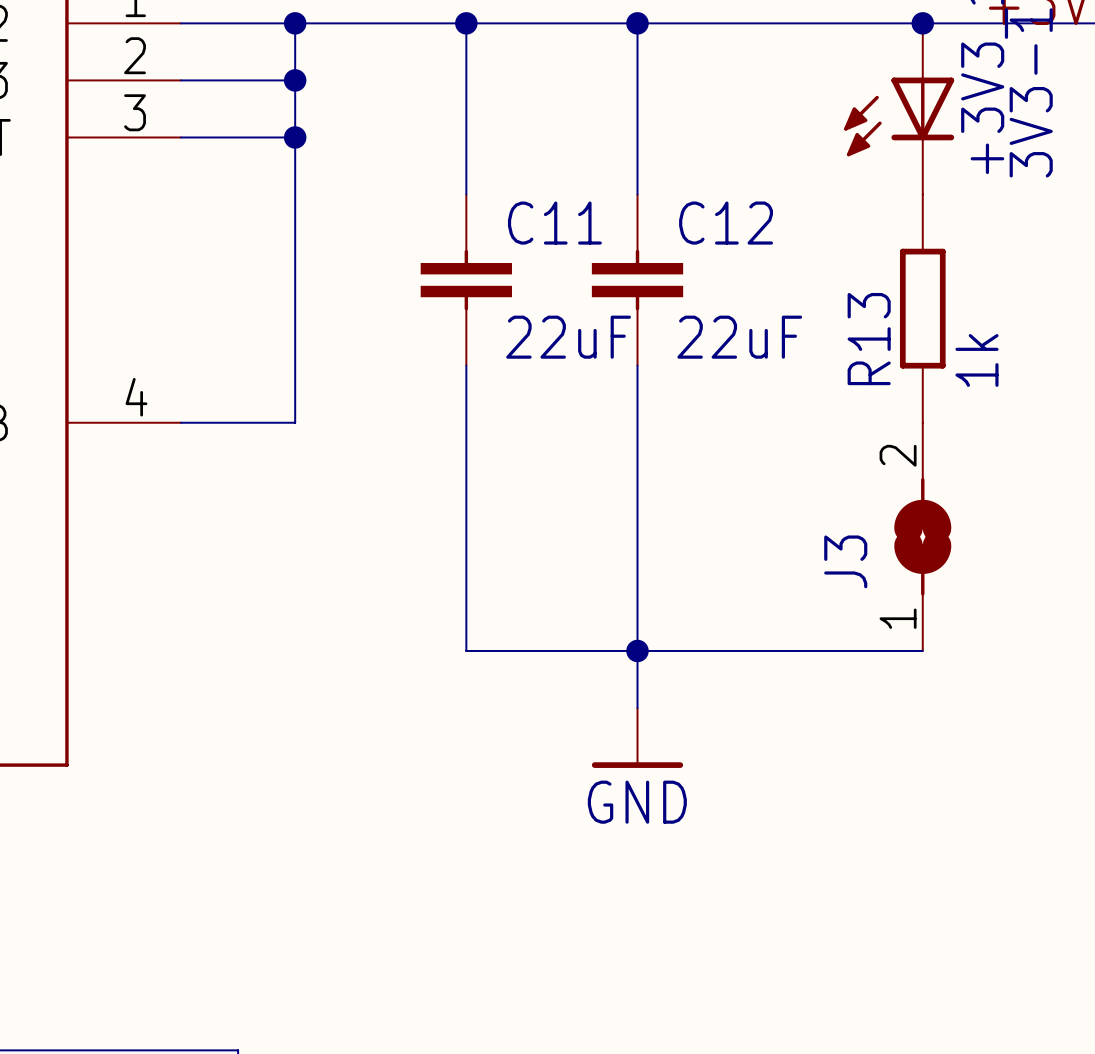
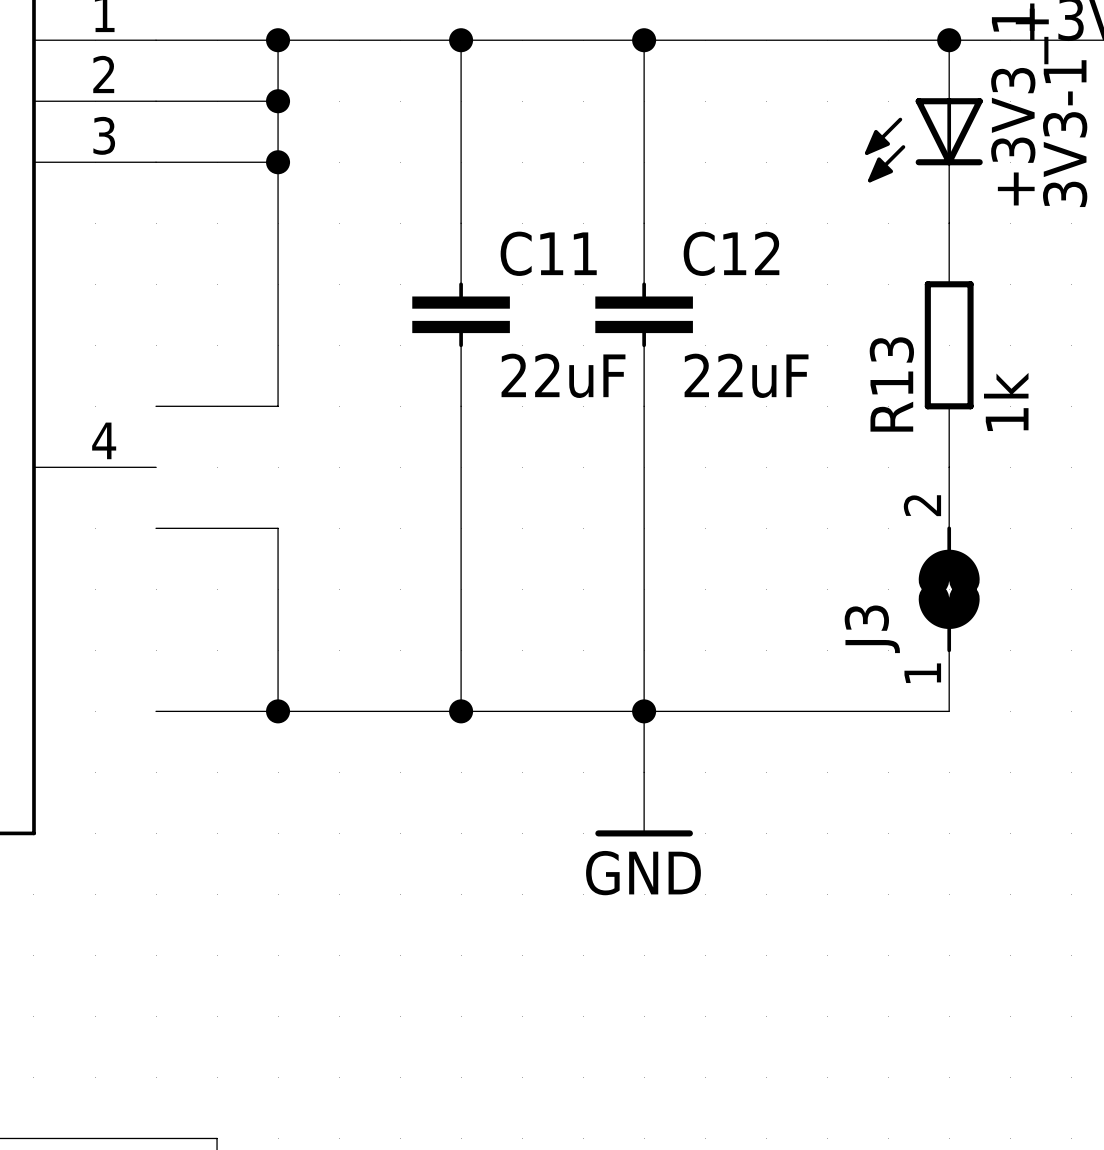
wire: (295, 365) (295, 422) (181, 422) -> (278, 406) (156, 406)
wire: none -> (156, 528) (278, 528) (278, 711)
wire: none -> (156, 711) (461, 711)
junction: none -> (278, 711)
junction: none -> (461, 711)

